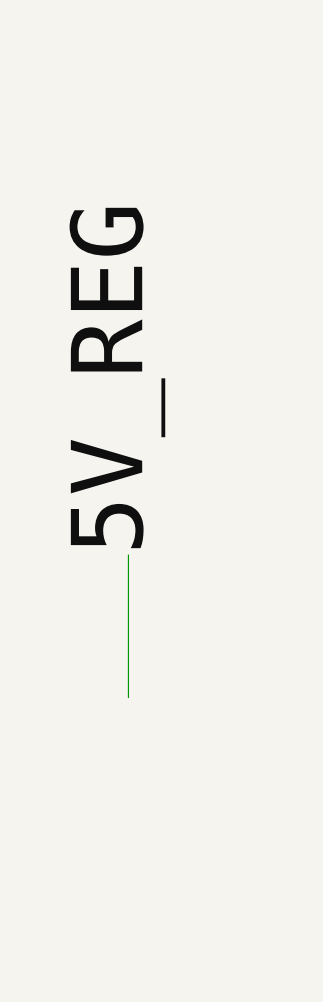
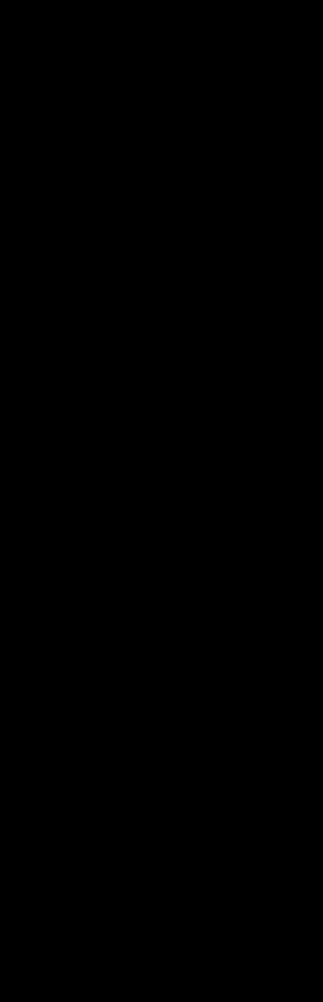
label: 5V_REG (117, 377) -> none
wire: (128, 554) (128, 697) -> none

